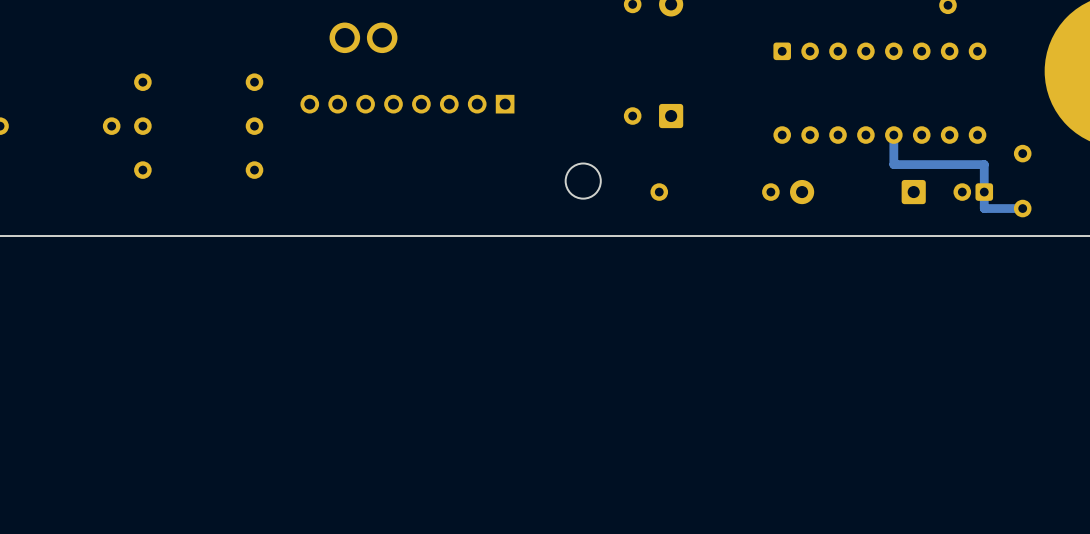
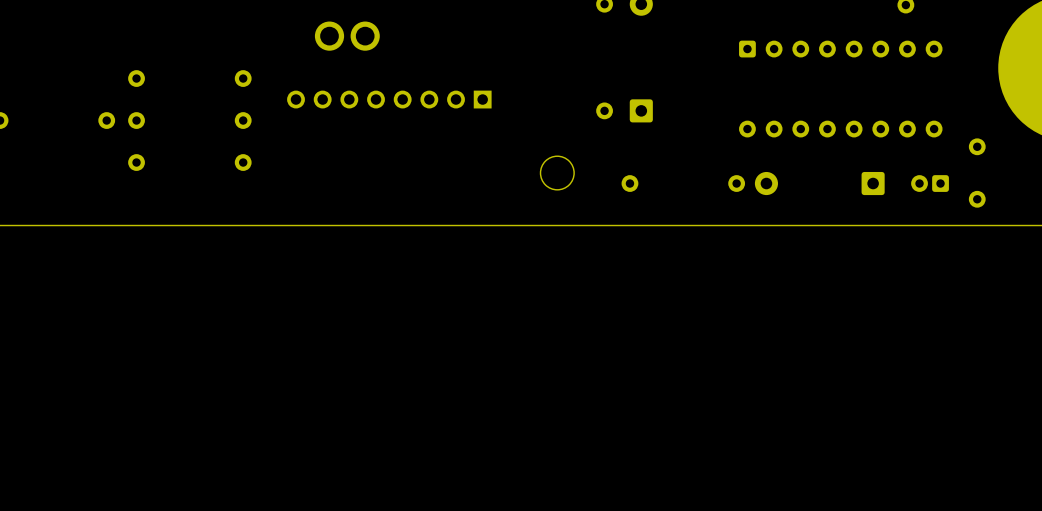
track: (893, 135) (893, 164) (984, 164) (984, 208) (1022, 208) -> none

